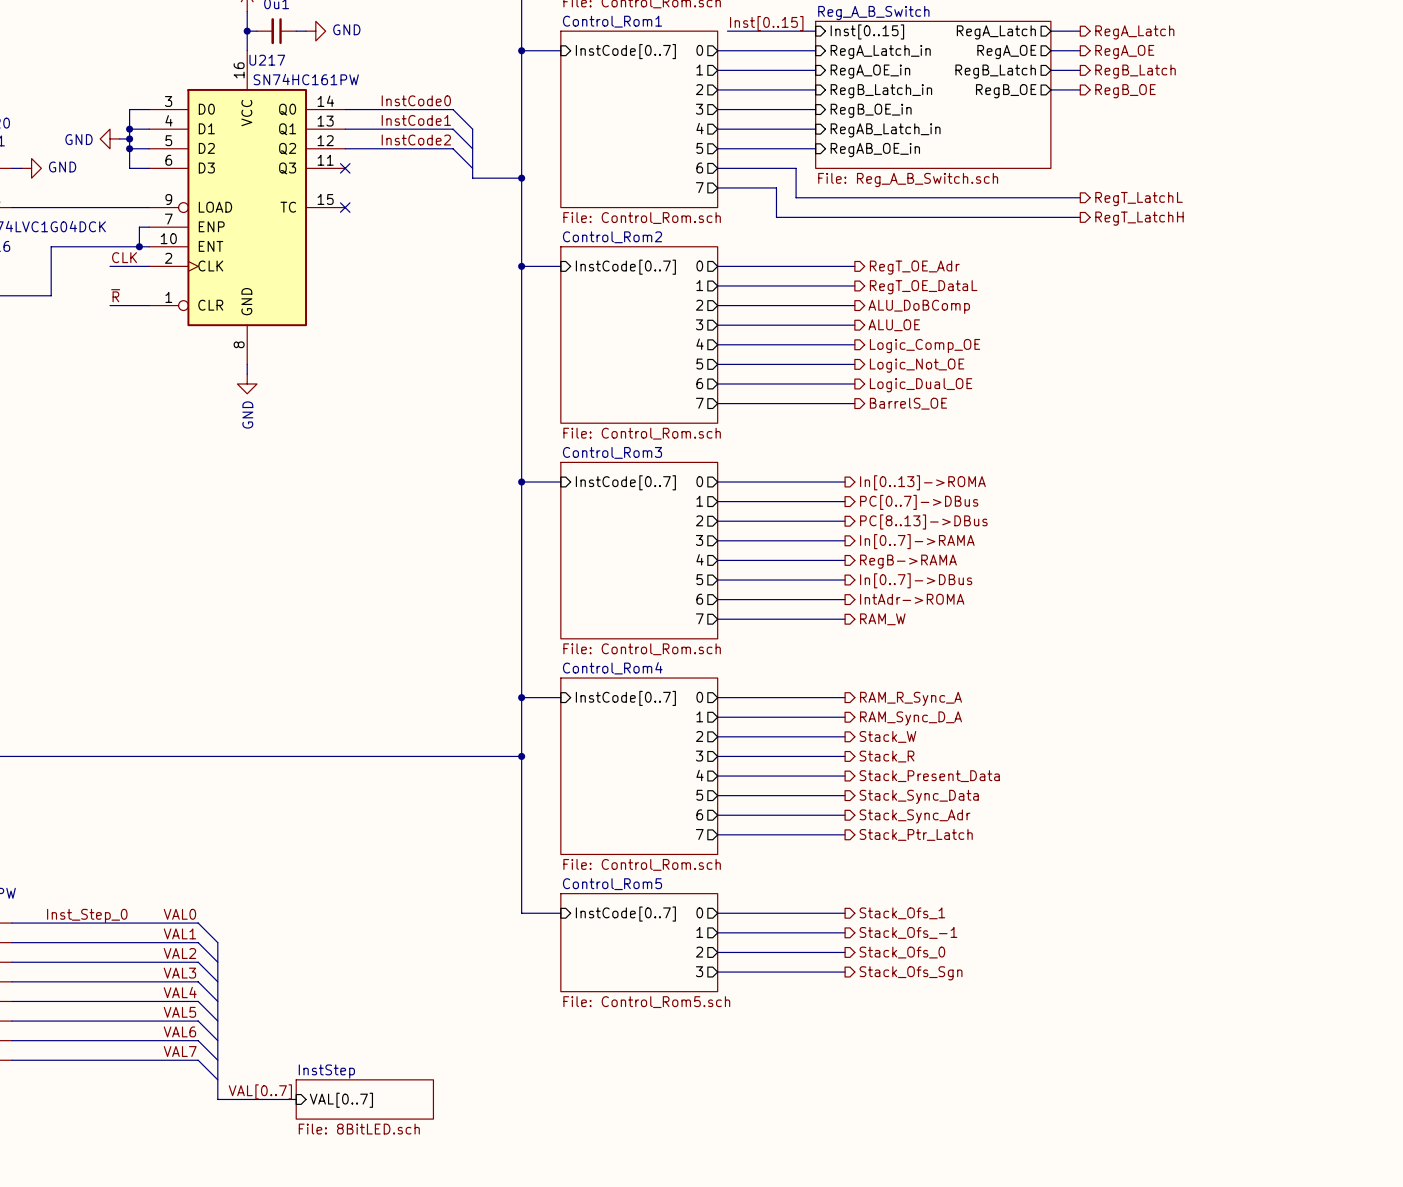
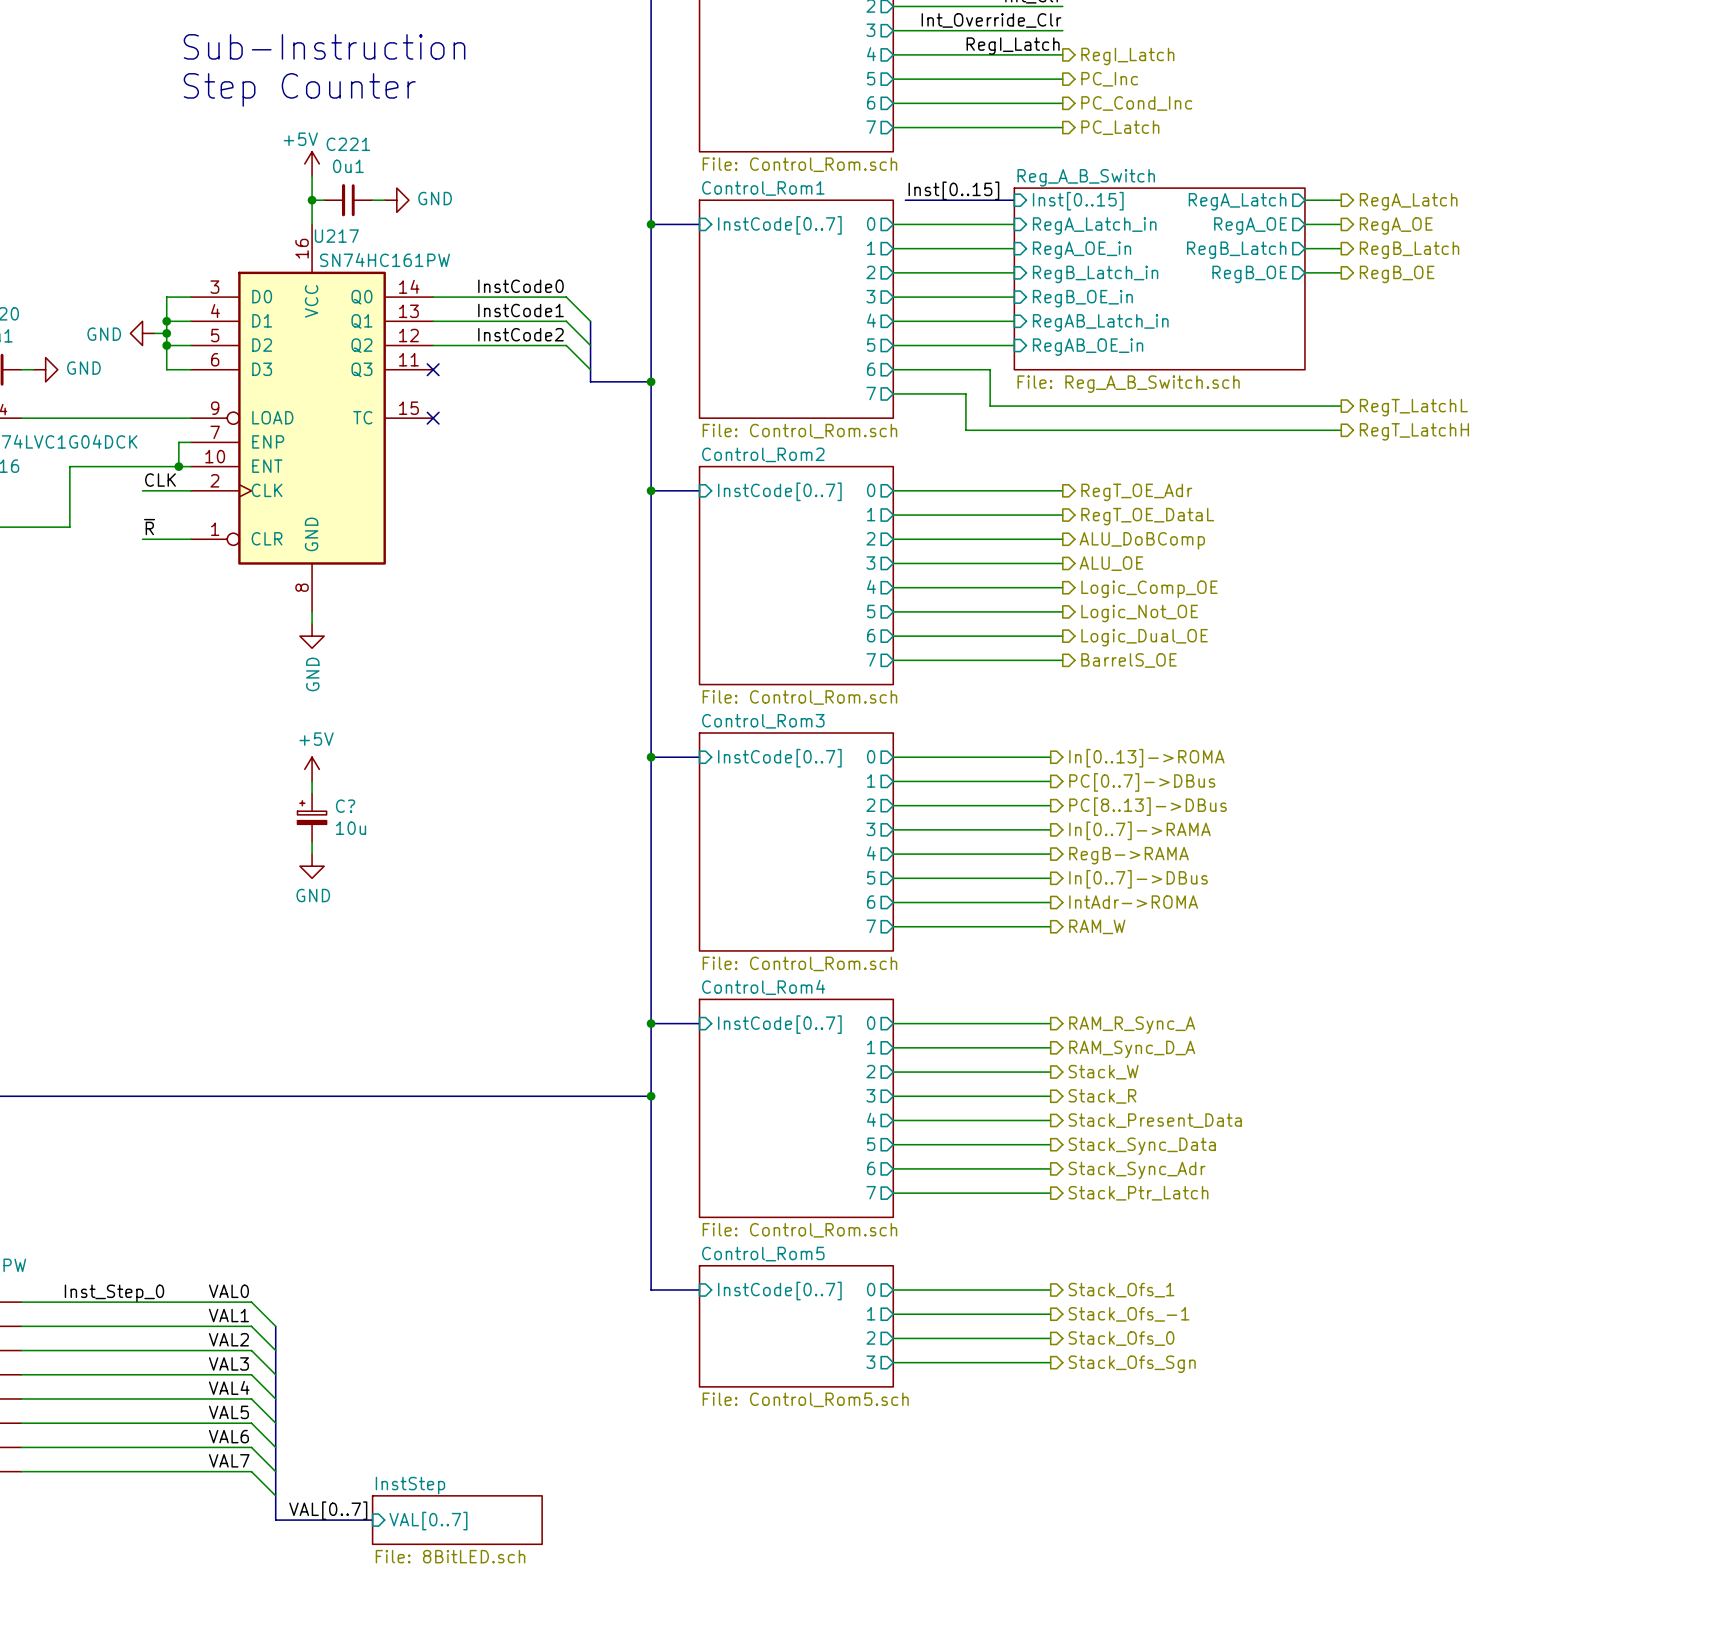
power symbol: none -> +5V (312, 769)
wire: none -> (312, 781) (312, 793)
C?: none -> 10u (312, 817)
wire: none -> (312, 841) (312, 854)
power symbol: none -> GND (312, 866)

